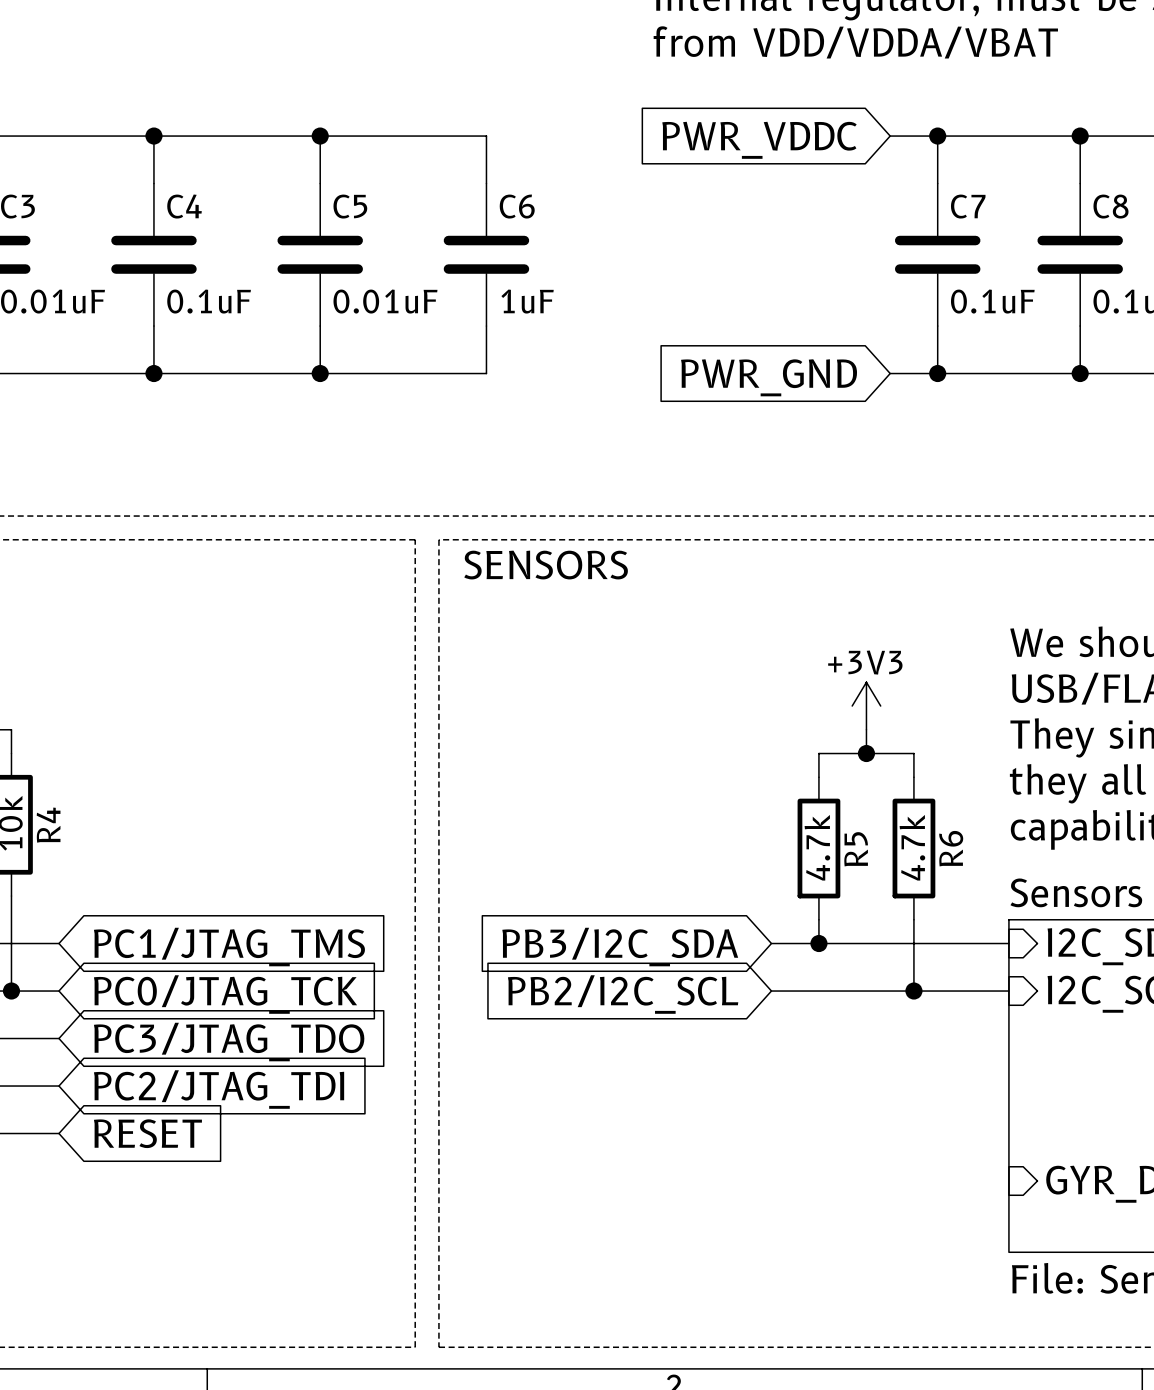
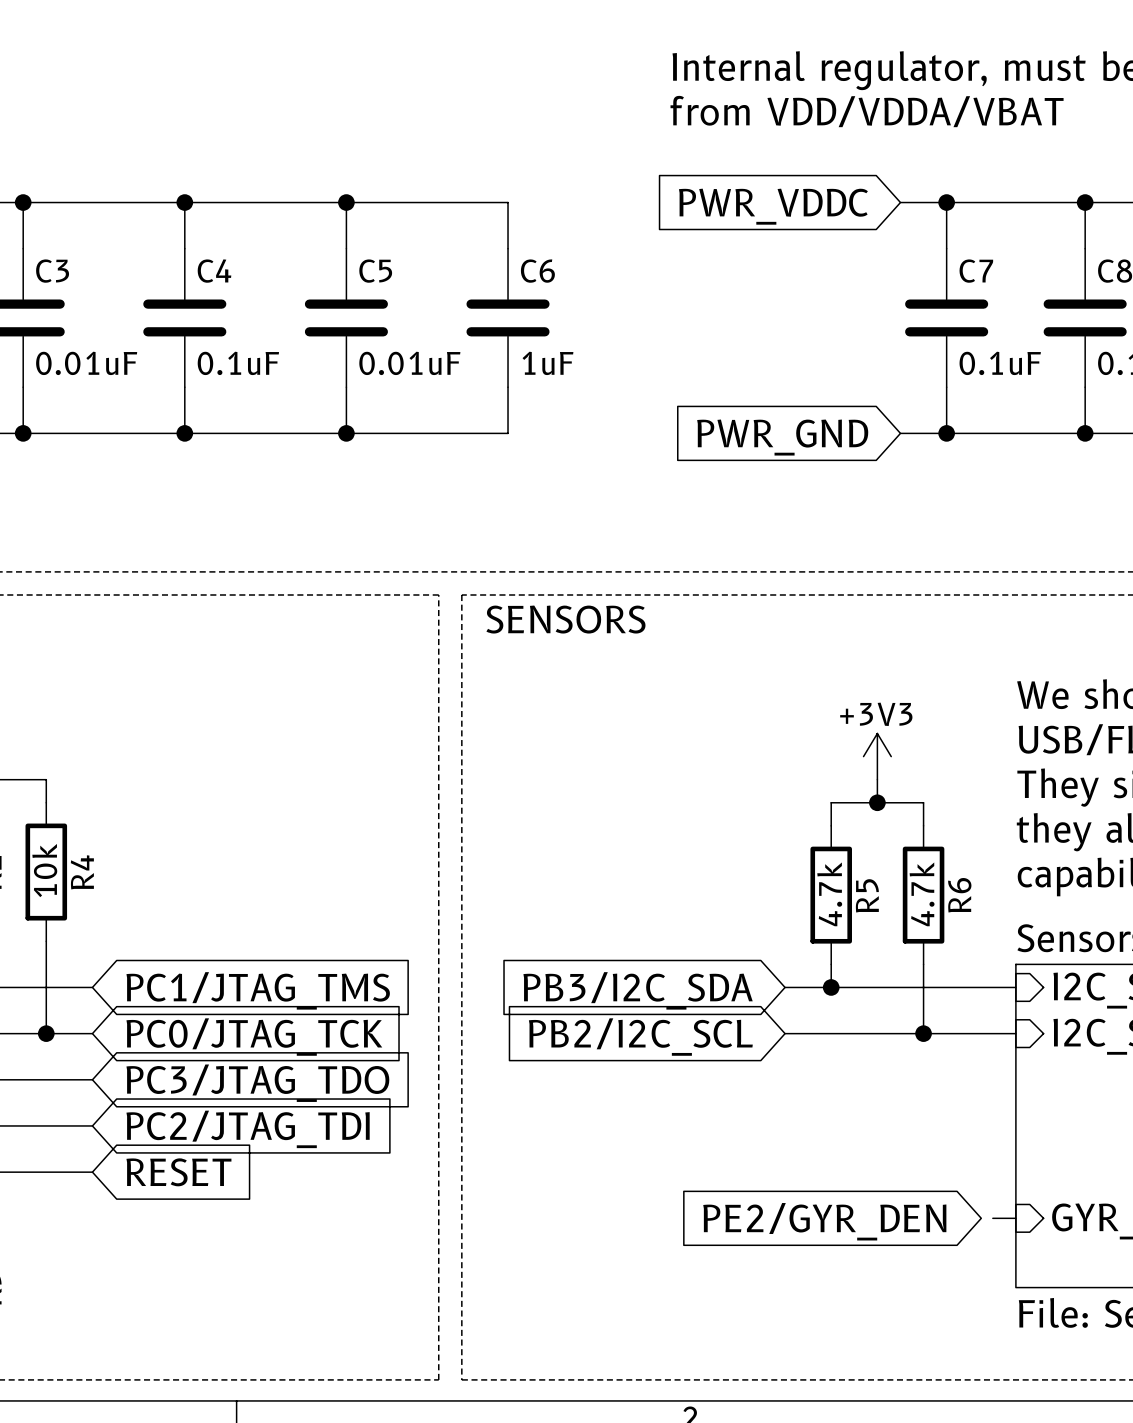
wire: none -> (992, 1218) (1015, 1218)
global label: none -> PE2/GYR_DEN (824, 1221)

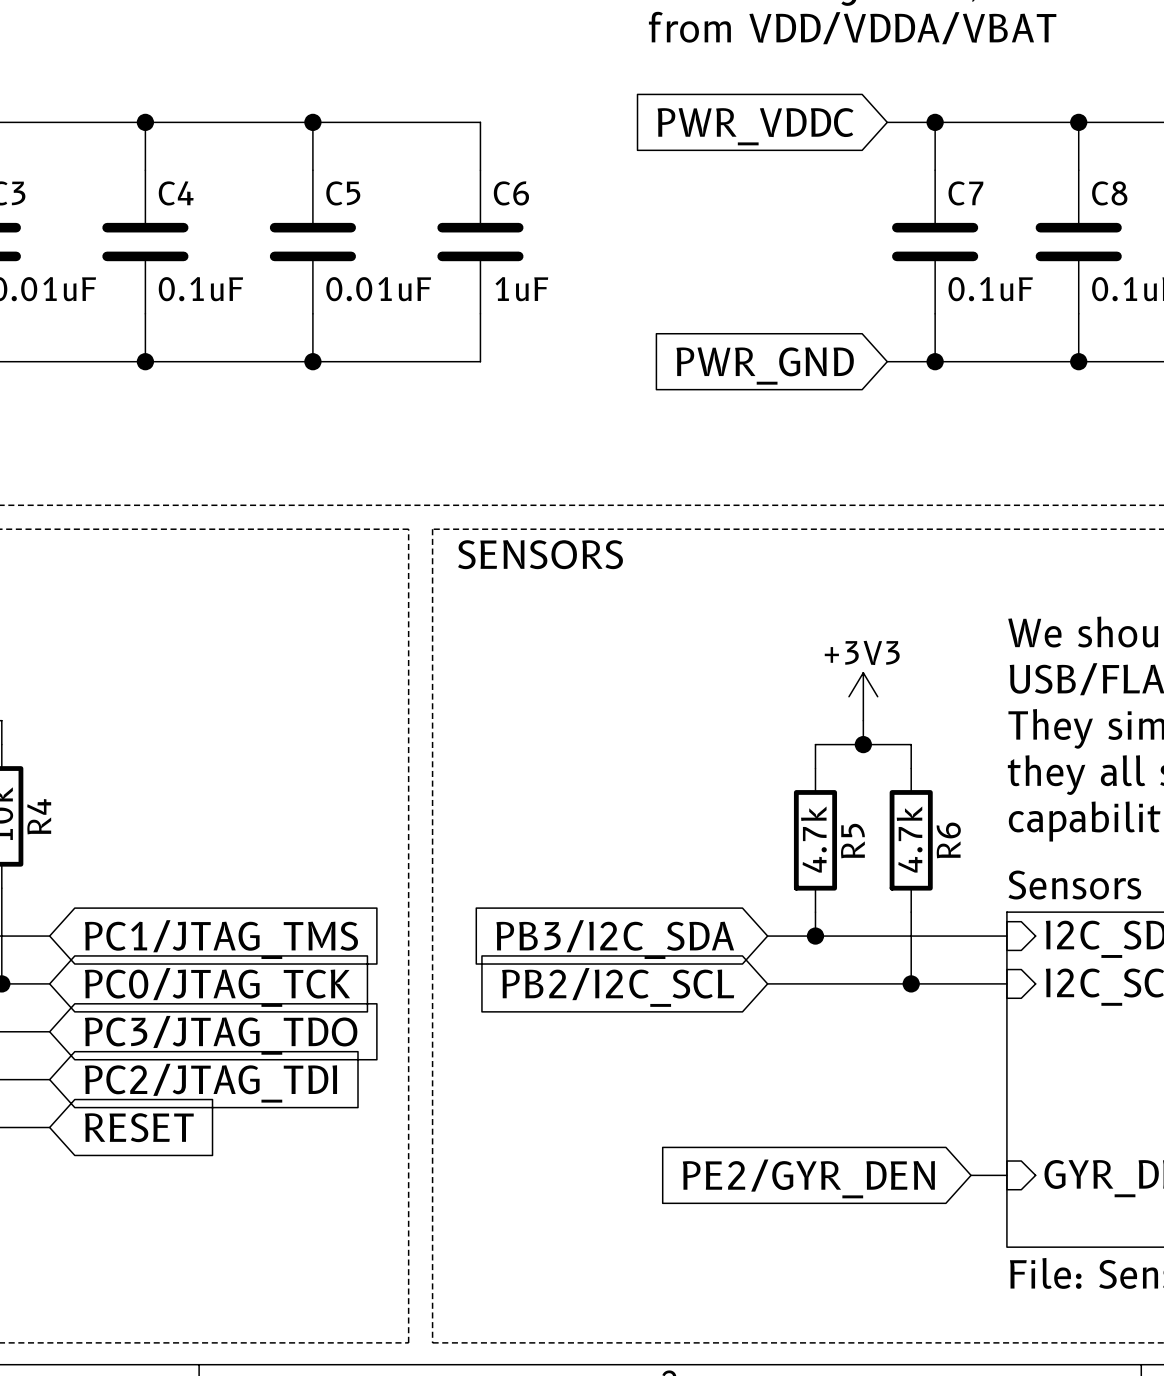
wire: none -> (971, 1175) (983, 1175)

